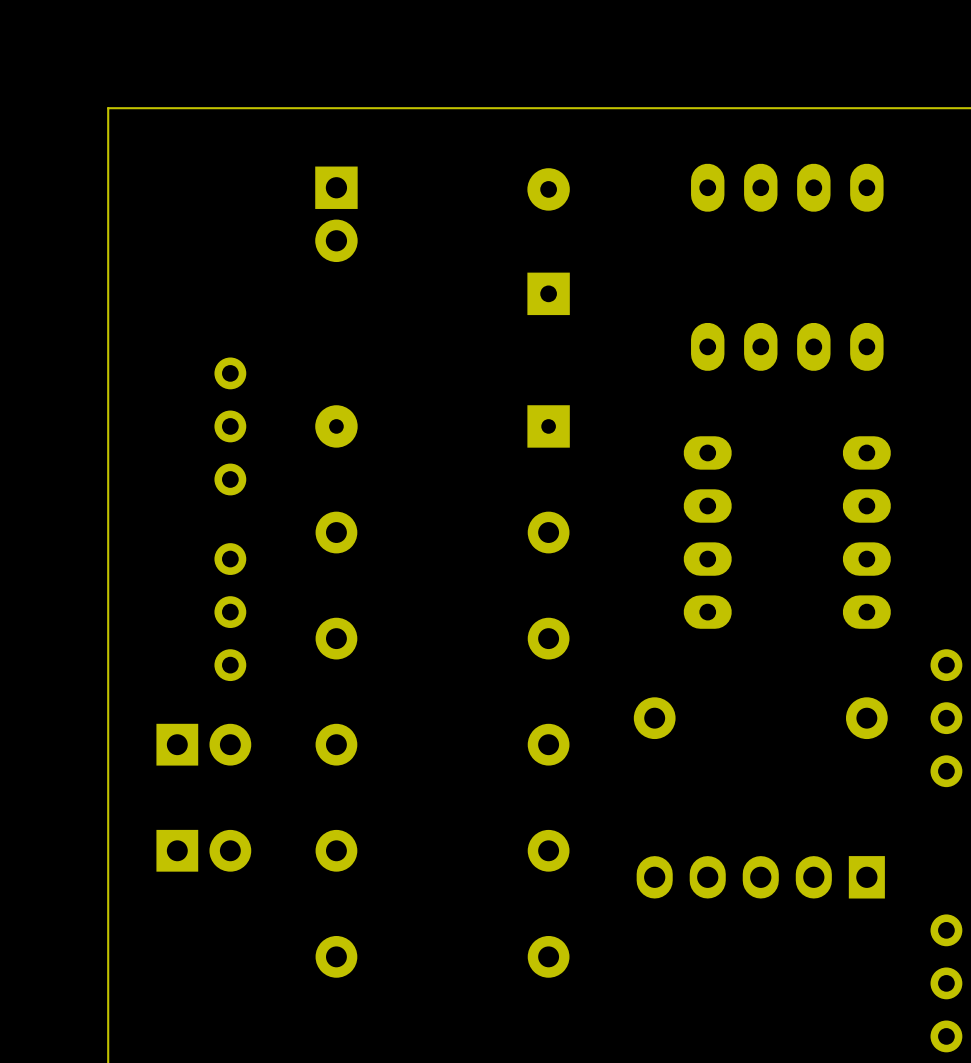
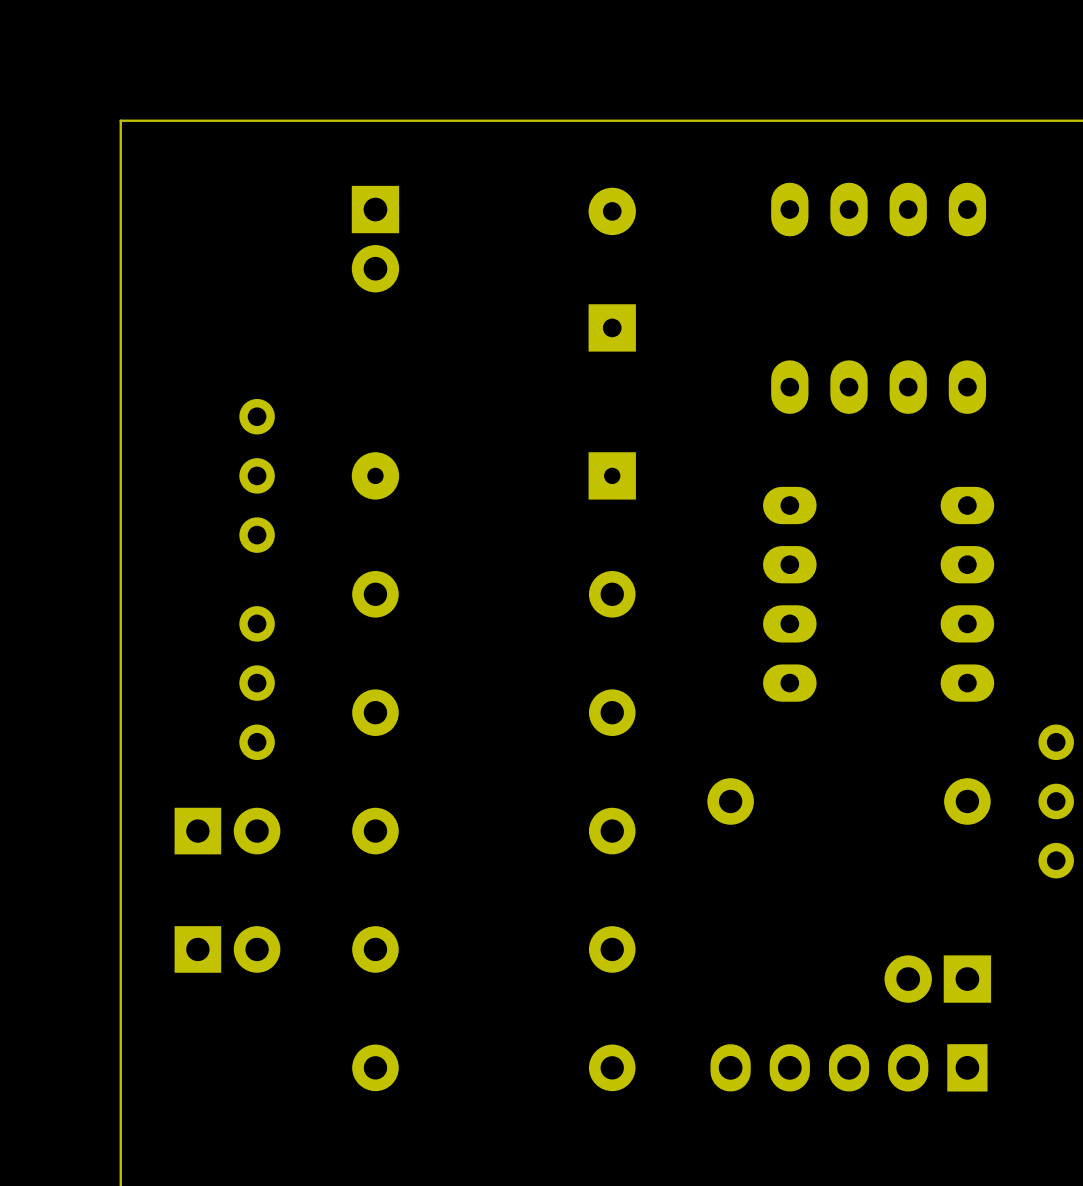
part position: (760, 877) -> (849, 1067)
part: none -> (937, 979)
part: (946, 983) -> none

